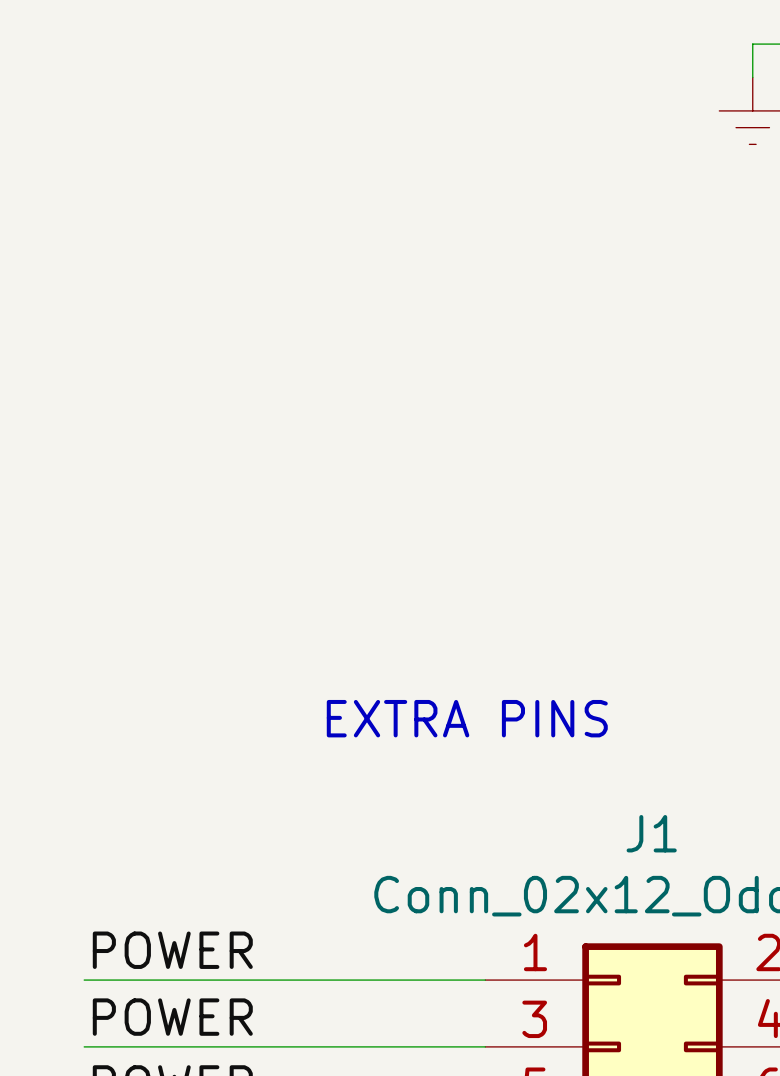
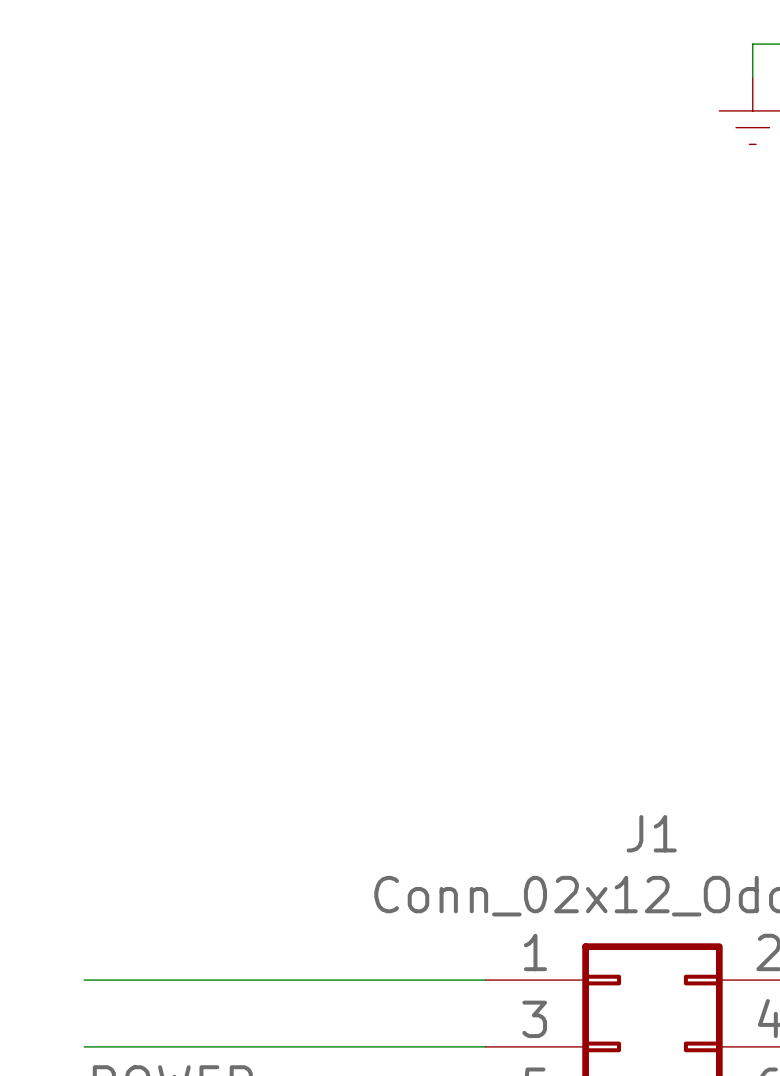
text: EXTRA PINS (467, 718) -> none
label: POWER (172, 950) -> none
label: POWER (172, 1017) -> none

